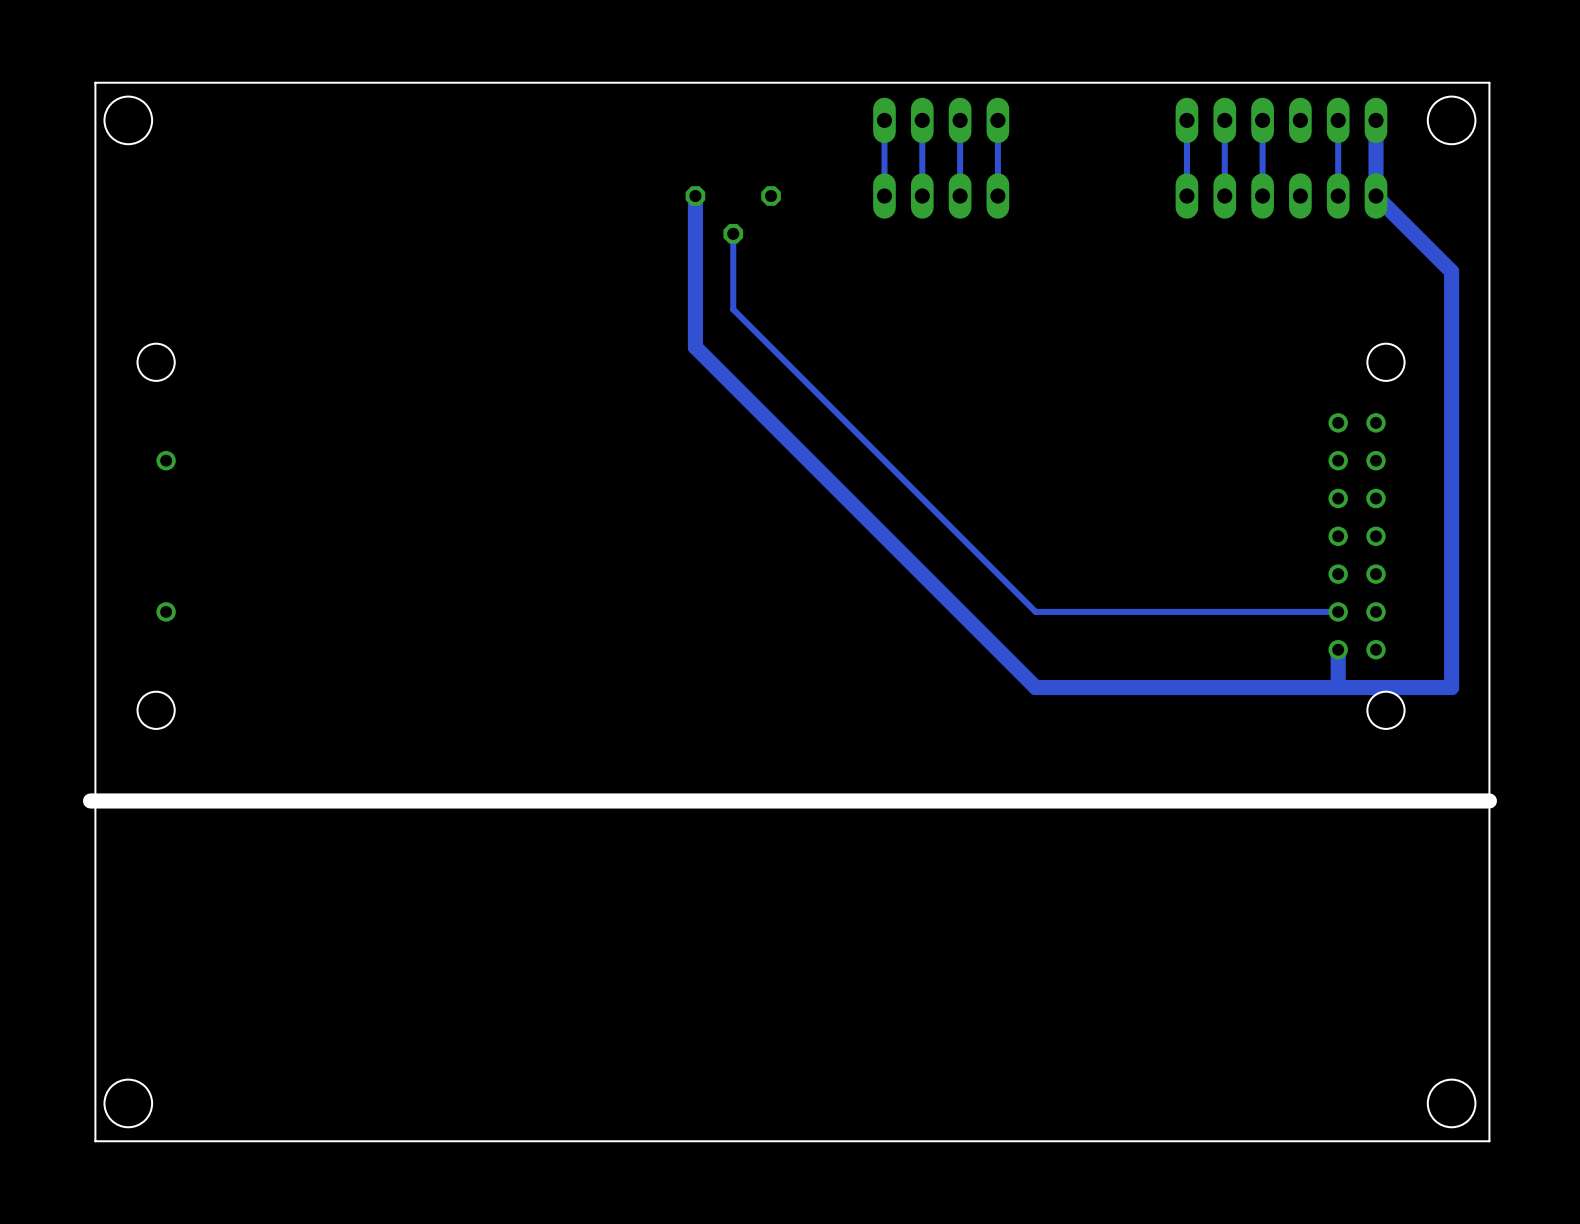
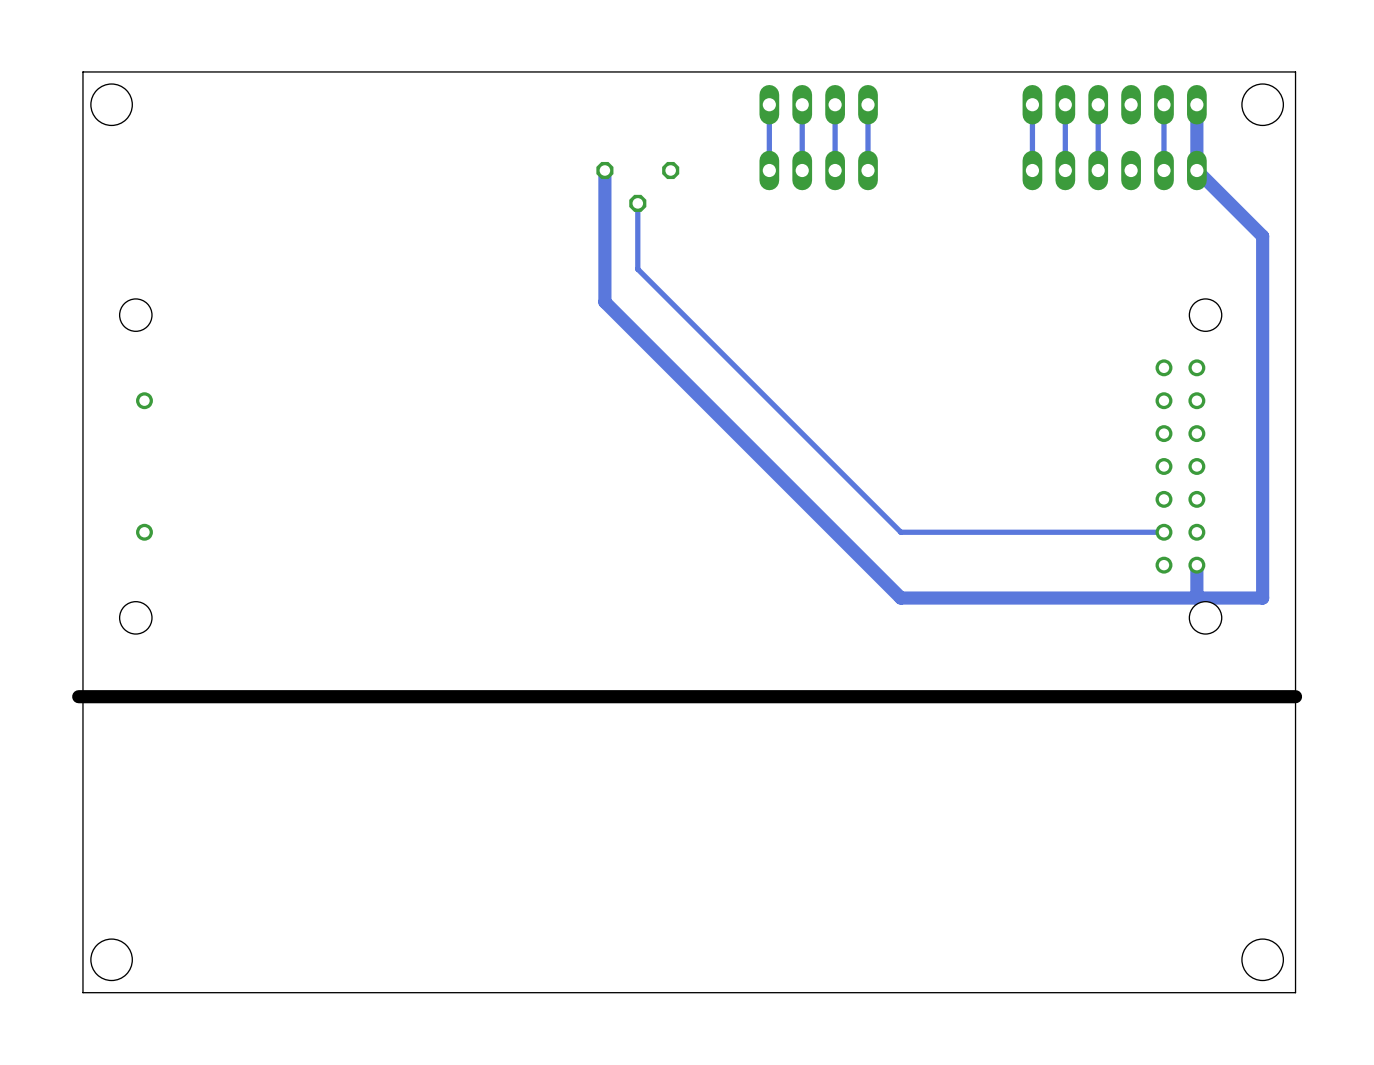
track: (1338, 649) (1338, 687) -> (1196, 565) (1196, 598)

